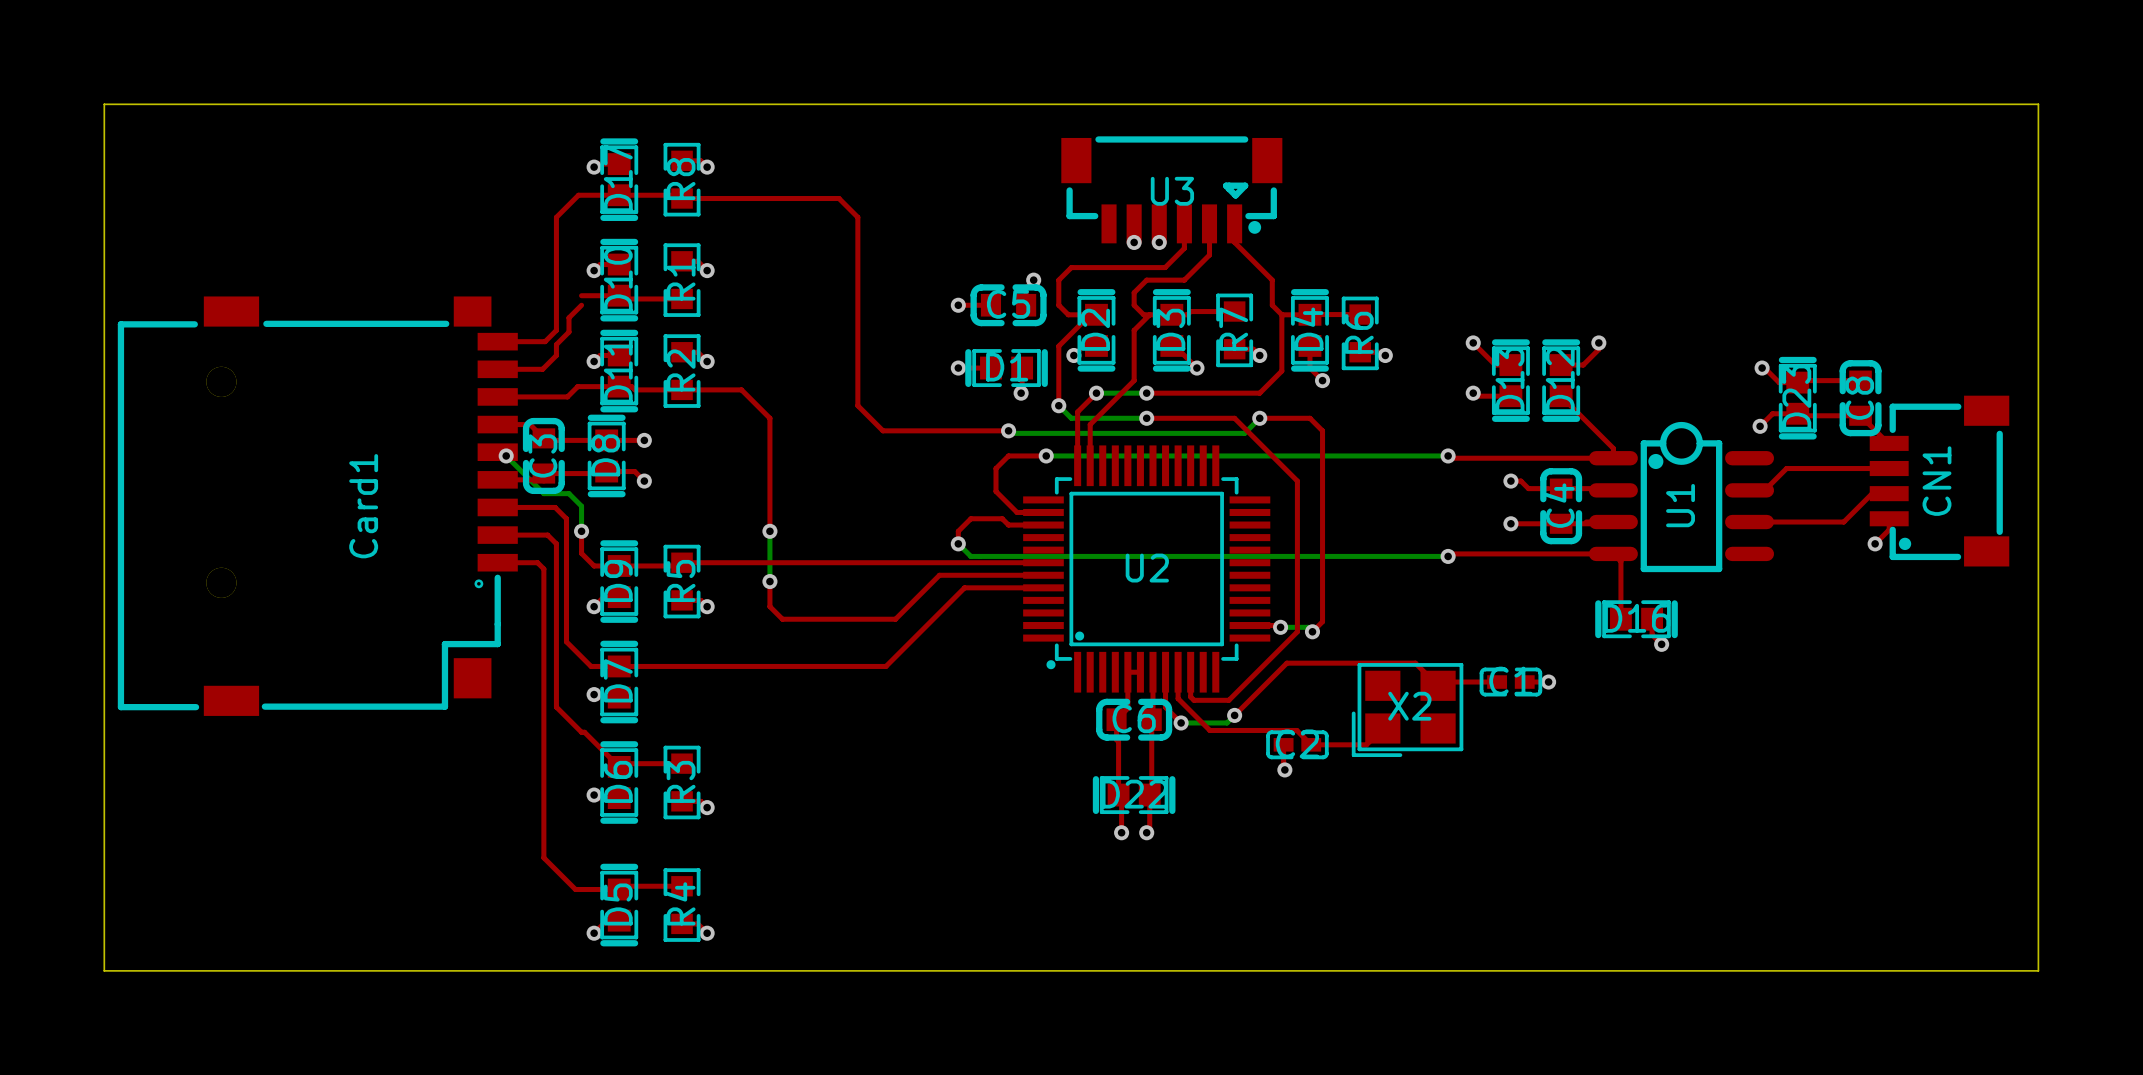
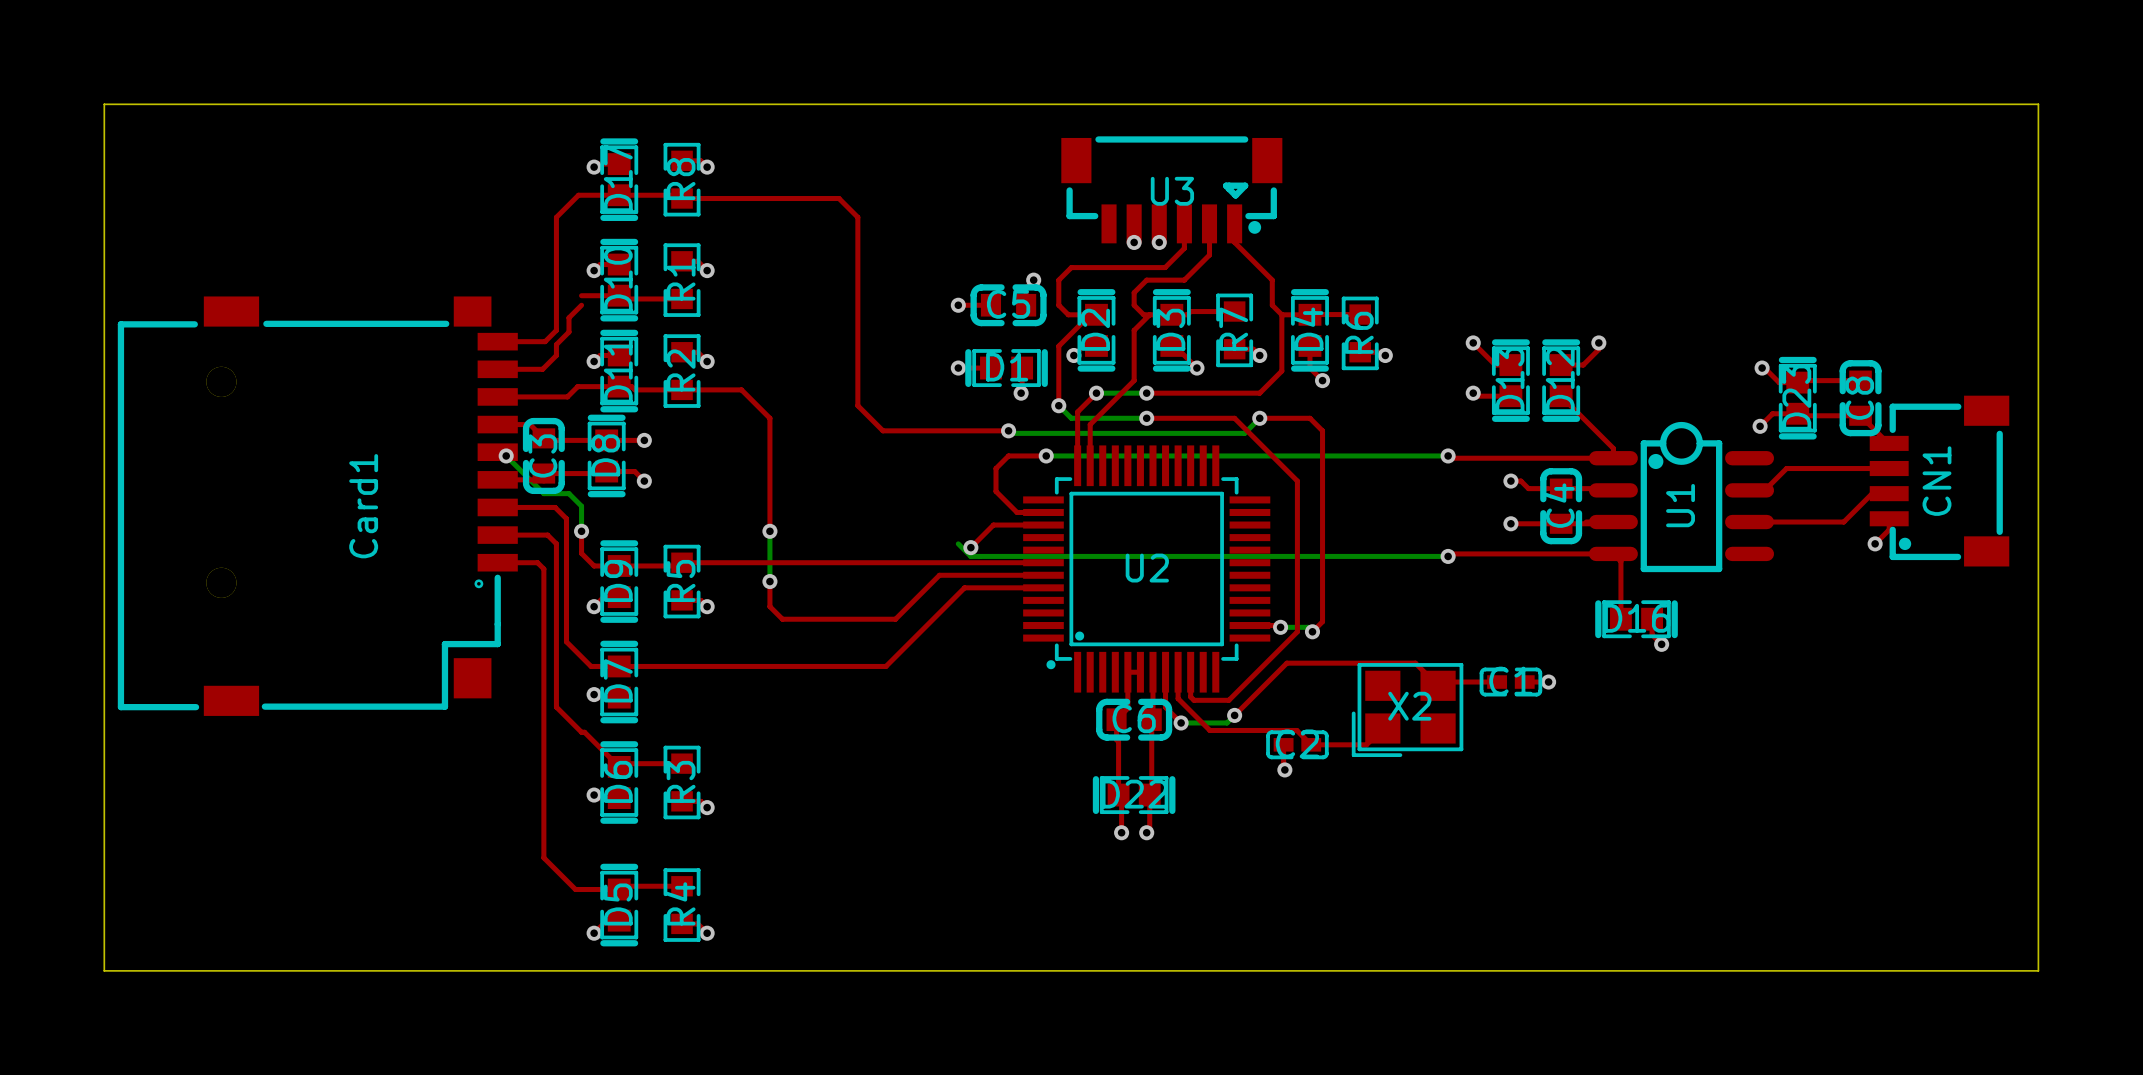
top track: (1008, 525) (1002, 518) (970, 518) (958, 531) (958, 543) -> (1008, 525) (993, 525) (970, 547)
via position: (958, 543) -> (970, 547)

